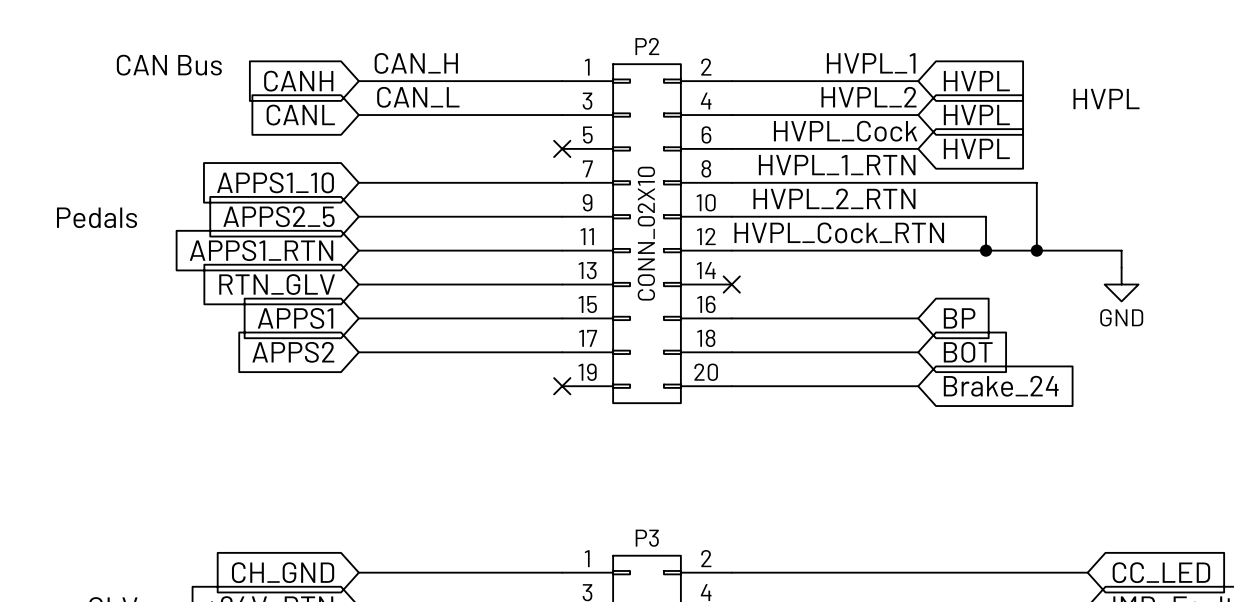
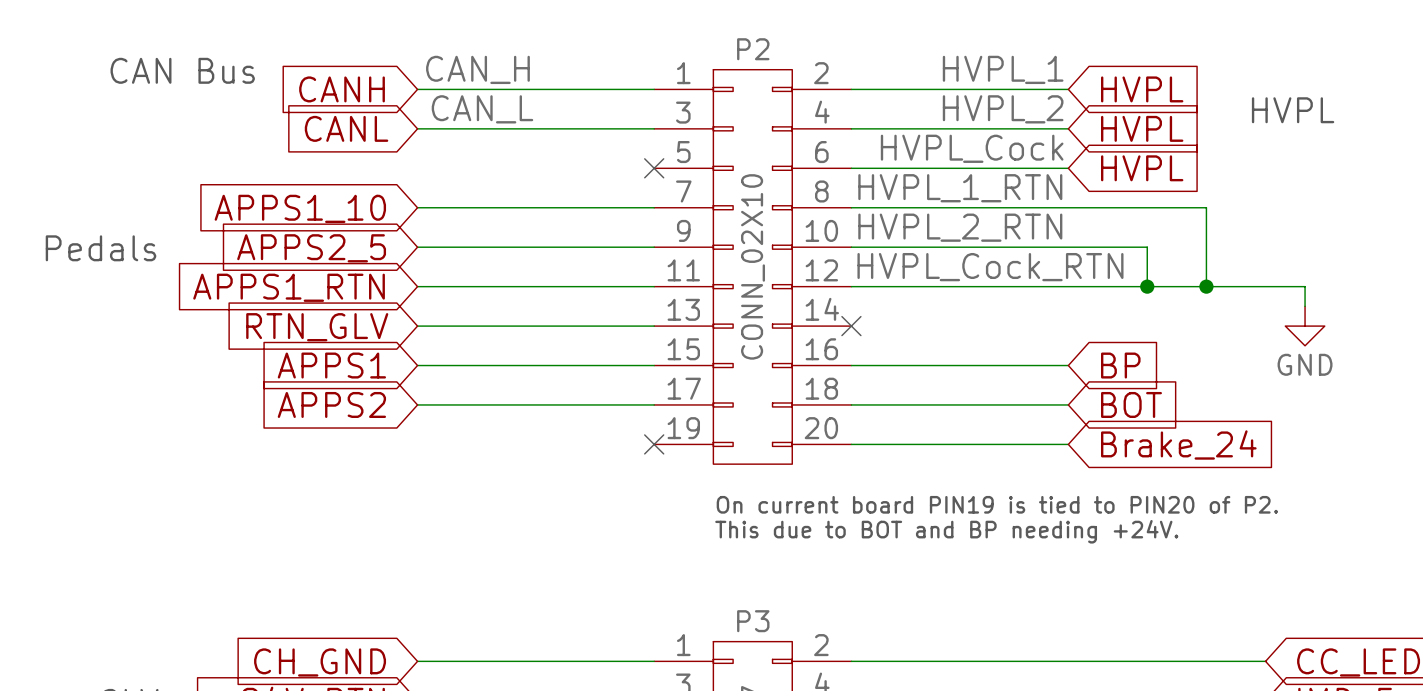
text: none -> On current board PIN19 is tied to PIN20 of P2. (997, 504)
text: none -> This due to BOT and BP needing +24V. (946, 531)

